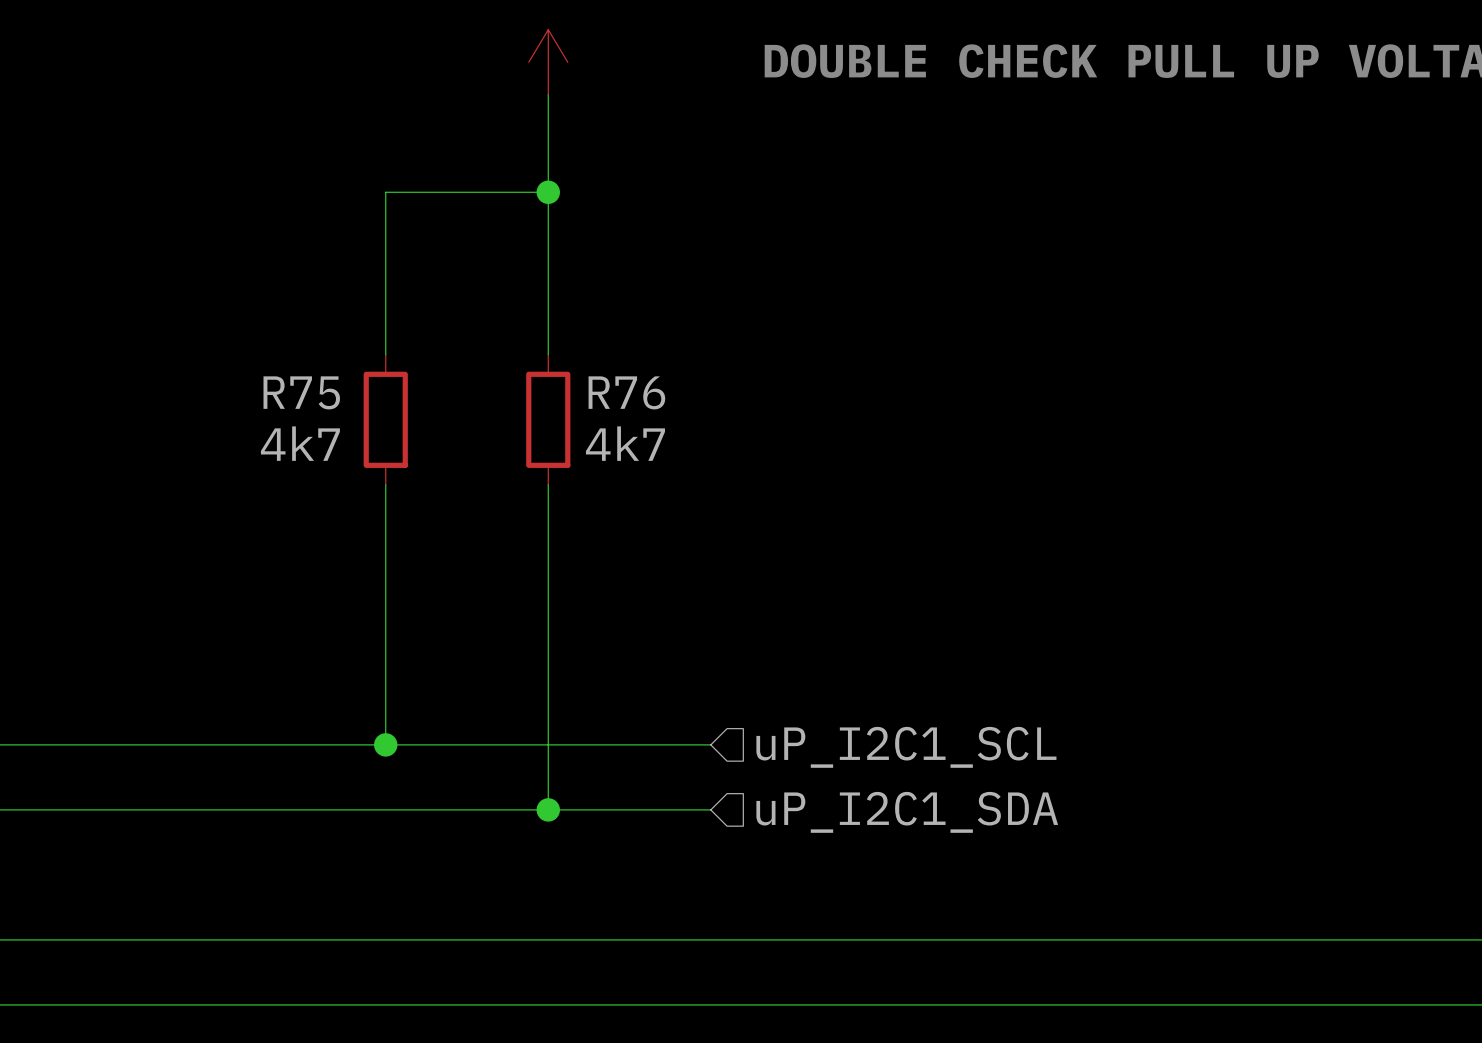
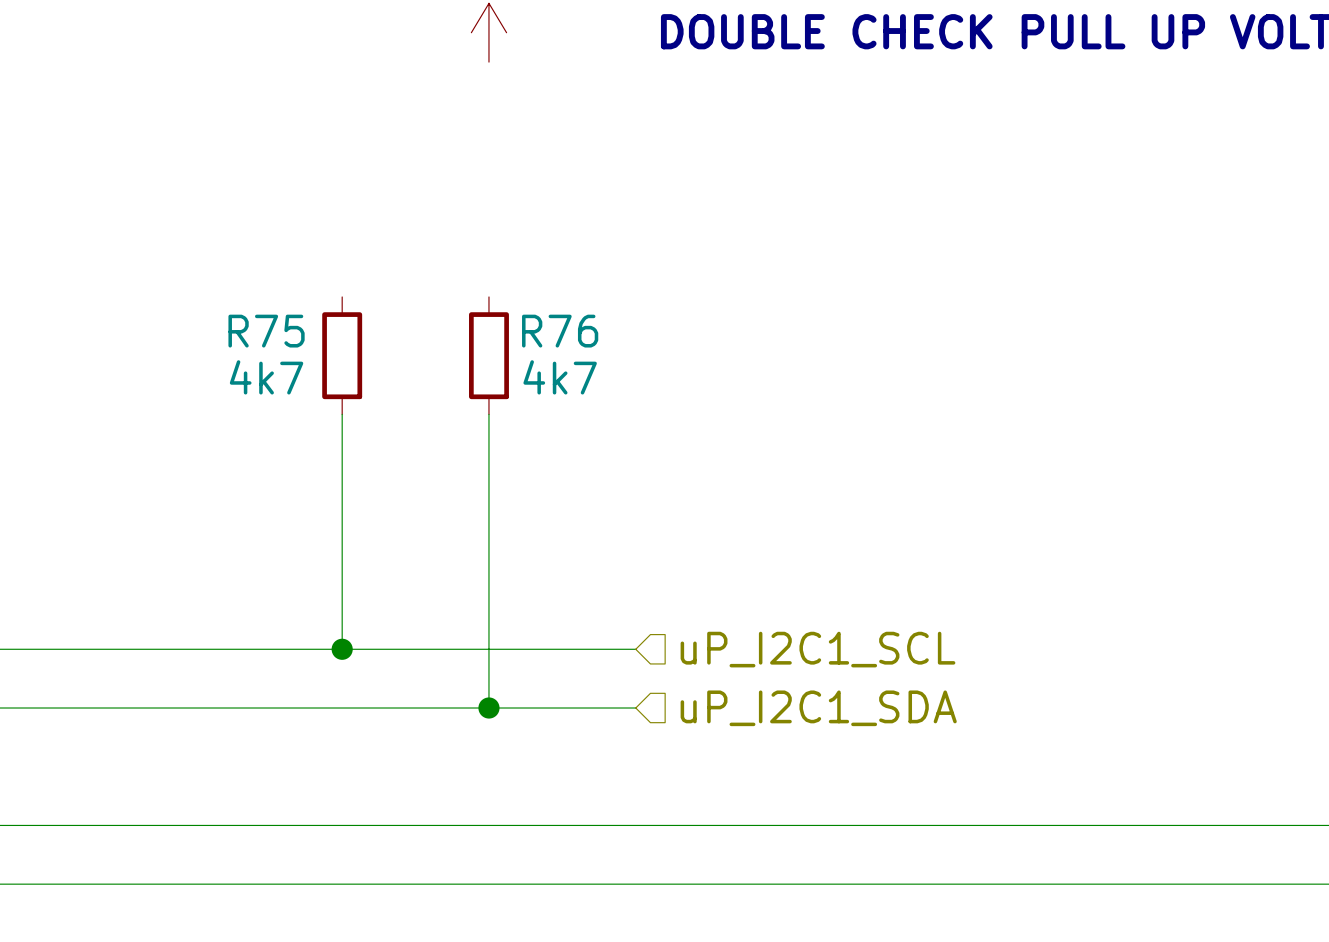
wire: (548, 94) (548, 354) -> none
wire: (548, 192) (385, 192) (385, 354) -> none
junction: (548, 192) -> none

